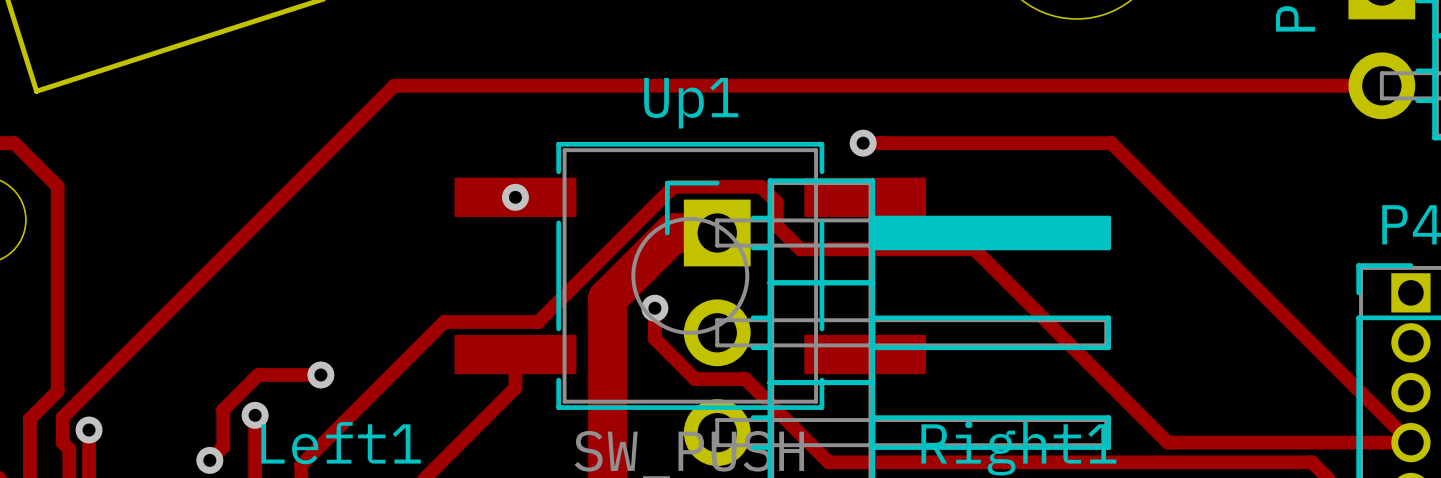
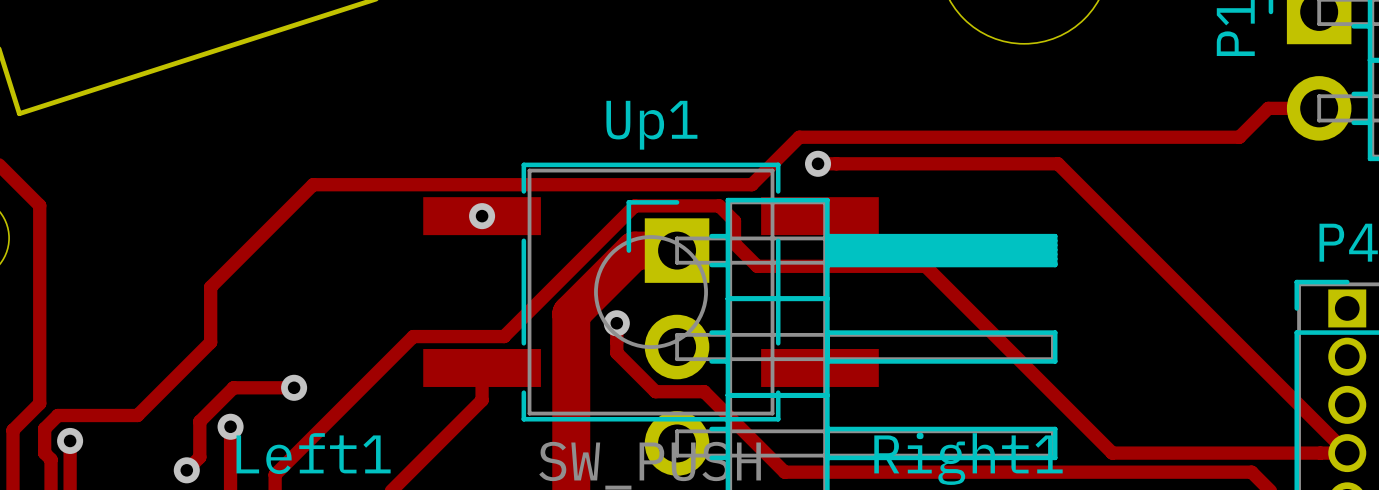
track: (1329, 85) (394, 85) (76, 403) -> (1268, 108) (1239, 137) (799, 137) (751, 184) (313, 184) (210, 287) (210, 342) (137, 415) (57, 415)

